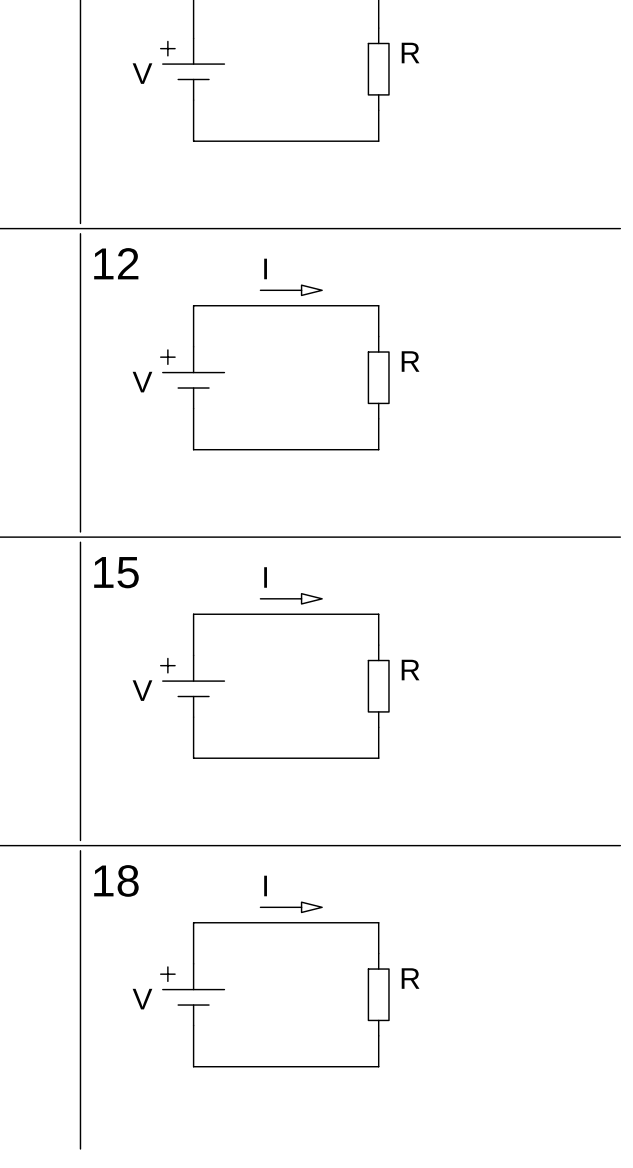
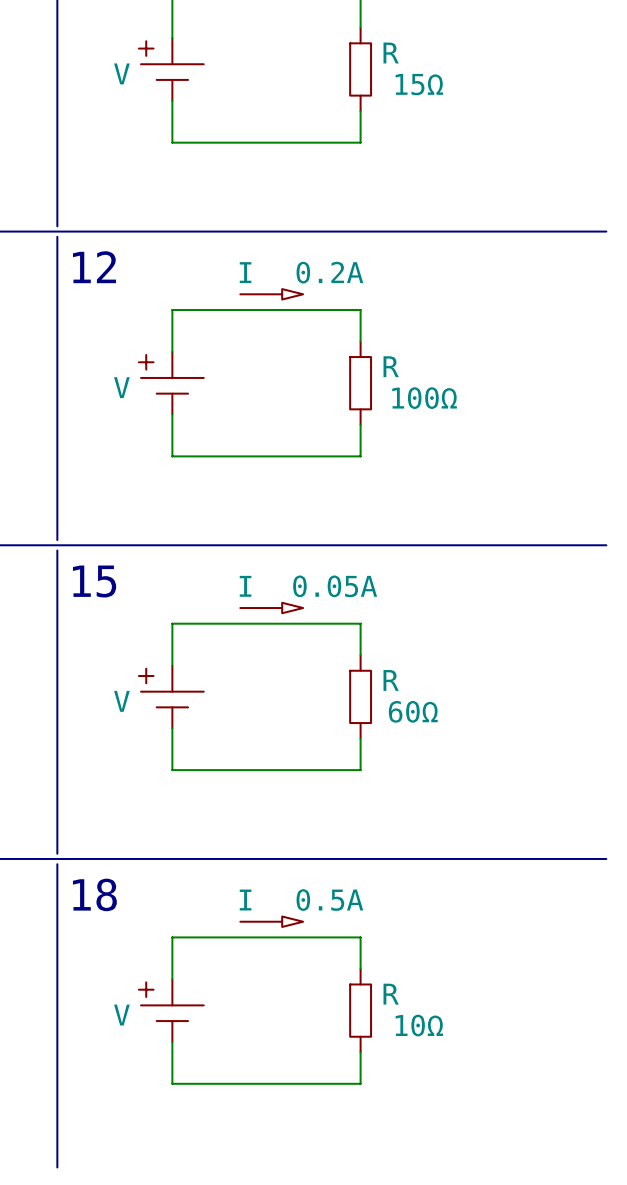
R value: none -> 15Ω (419, 84)
I value: none -> 0.2A (329, 272)
R value: none -> 100Ω (424, 398)
I value: none -> 0.05A (335, 586)
R value: none -> 60Ω (413, 711)
I value: none -> 0.5A (329, 900)
R value: none -> 10Ω (419, 1025)

